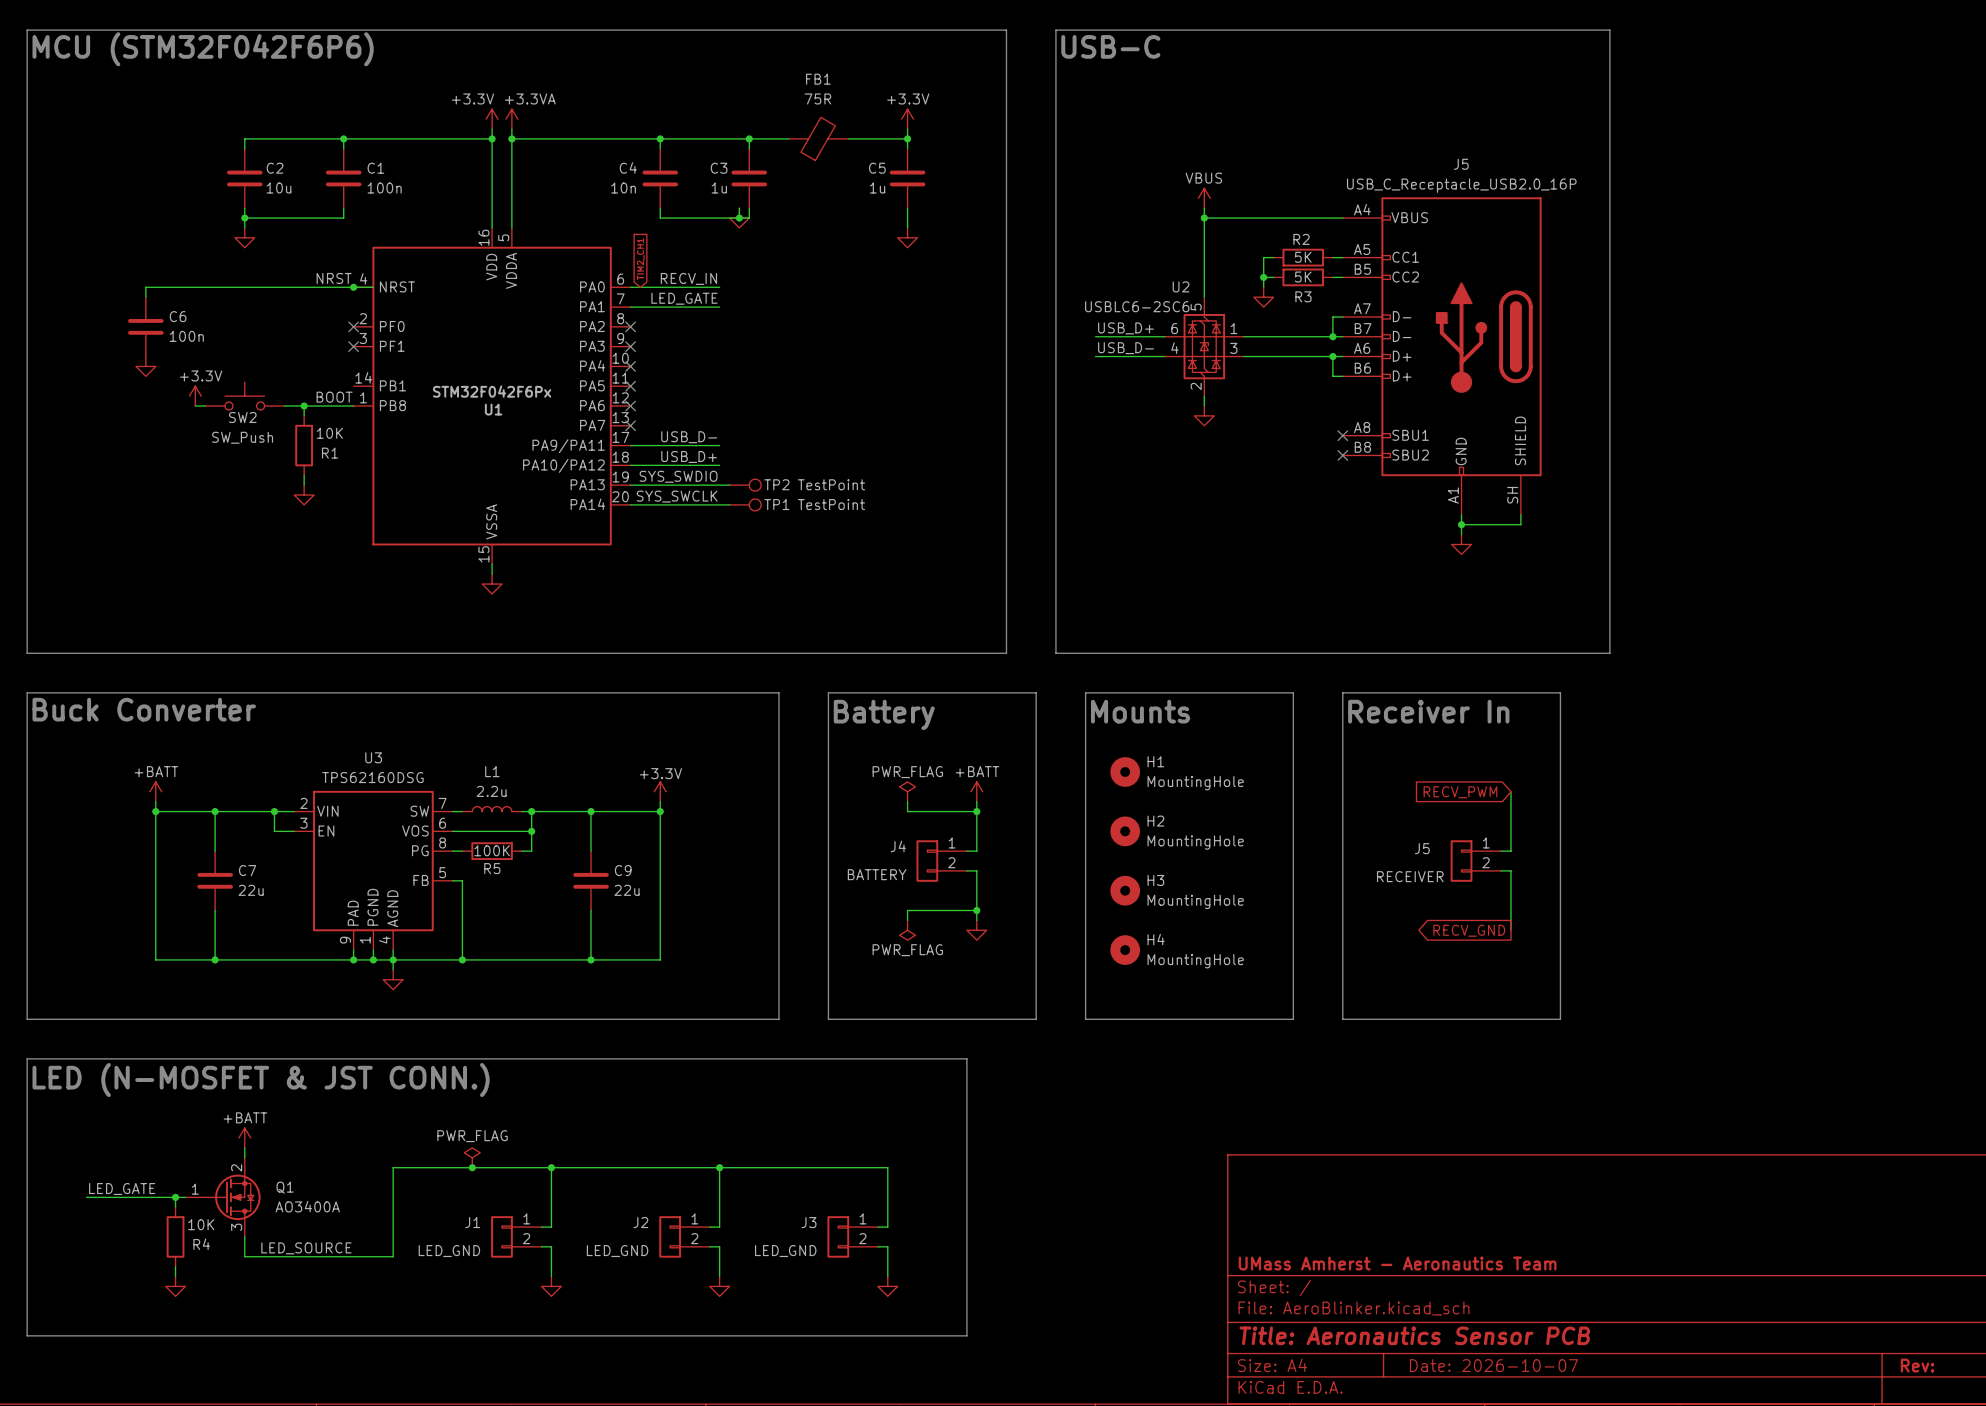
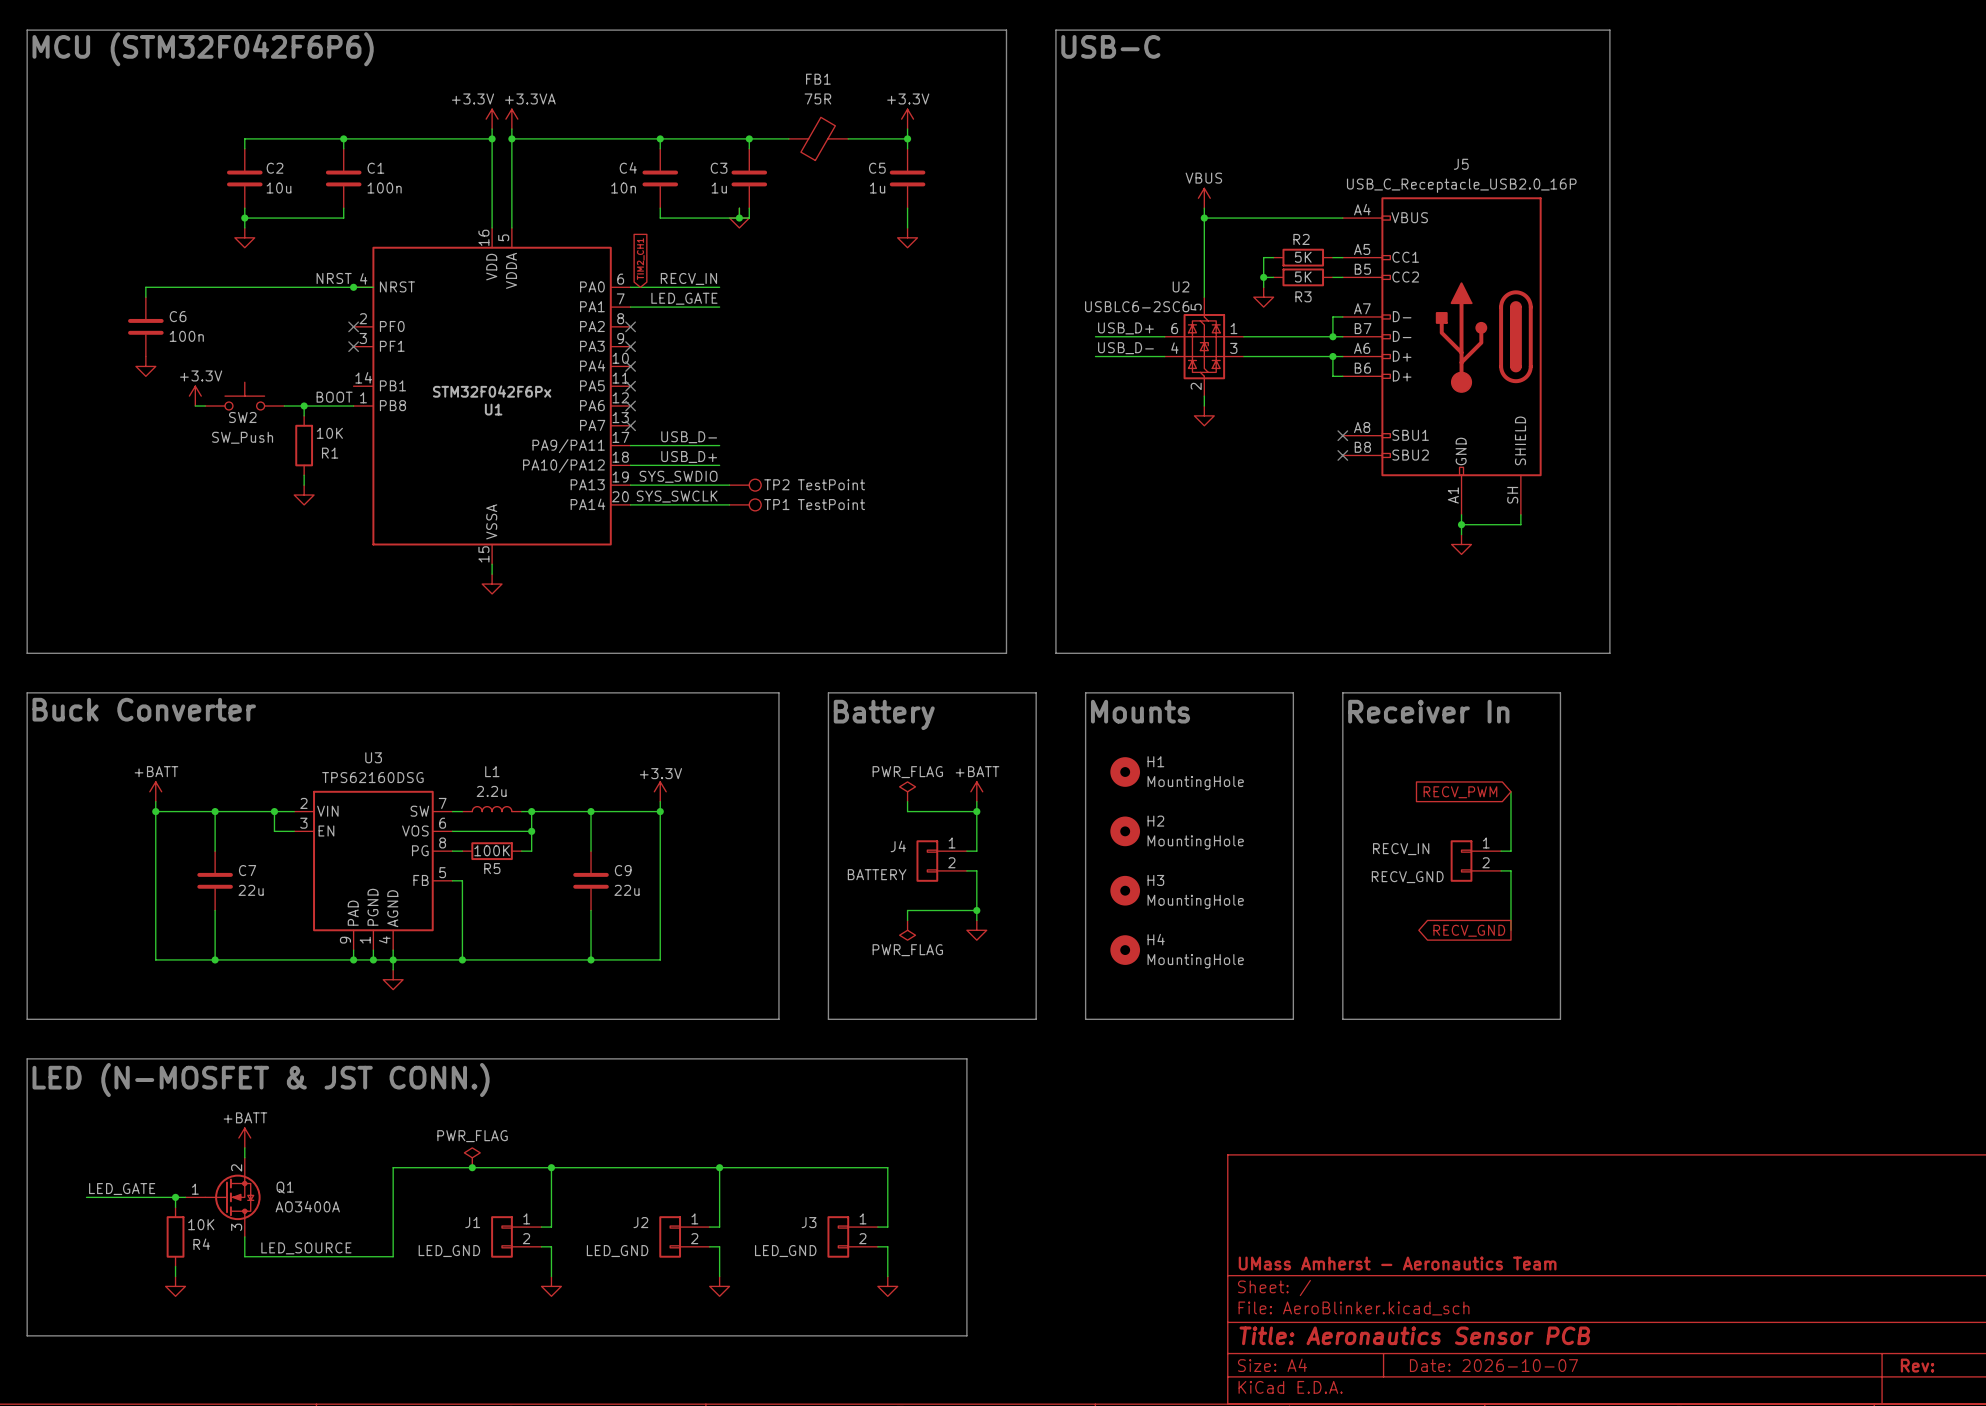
J5 name: J5 (1422, 848) -> RECV_IN (1401, 849)
J5 value: RECEIVER (1410, 876) -> RECV_GND (1407, 877)

